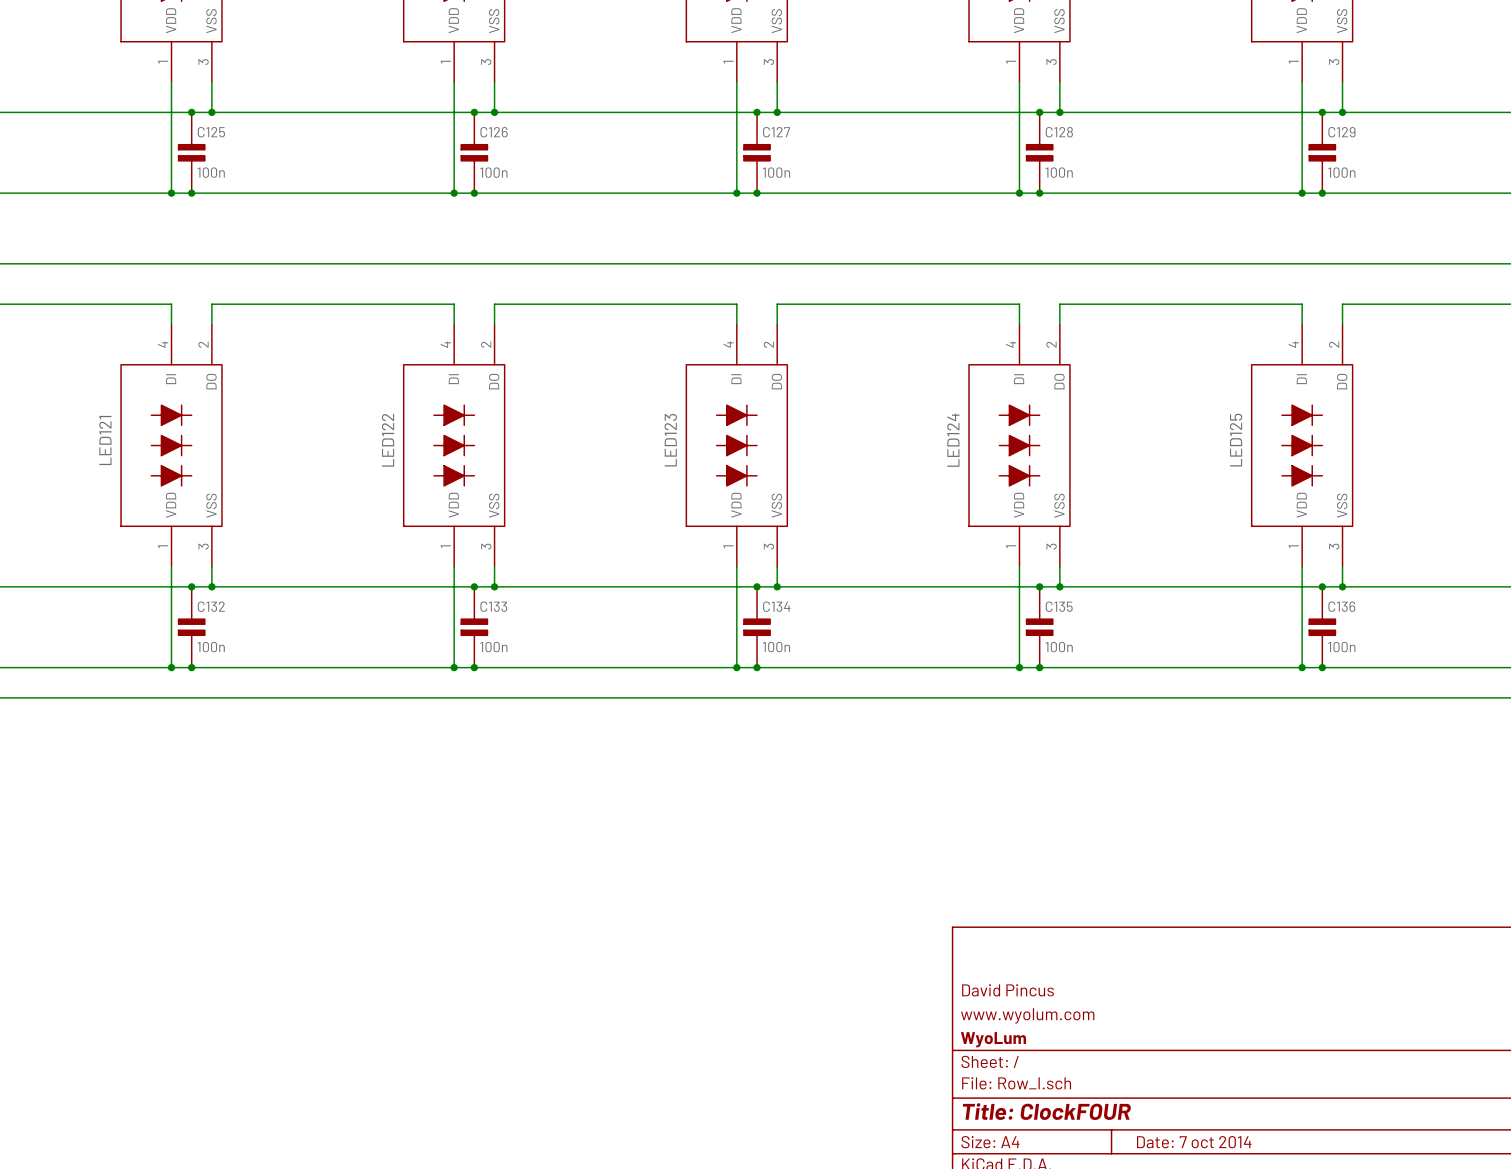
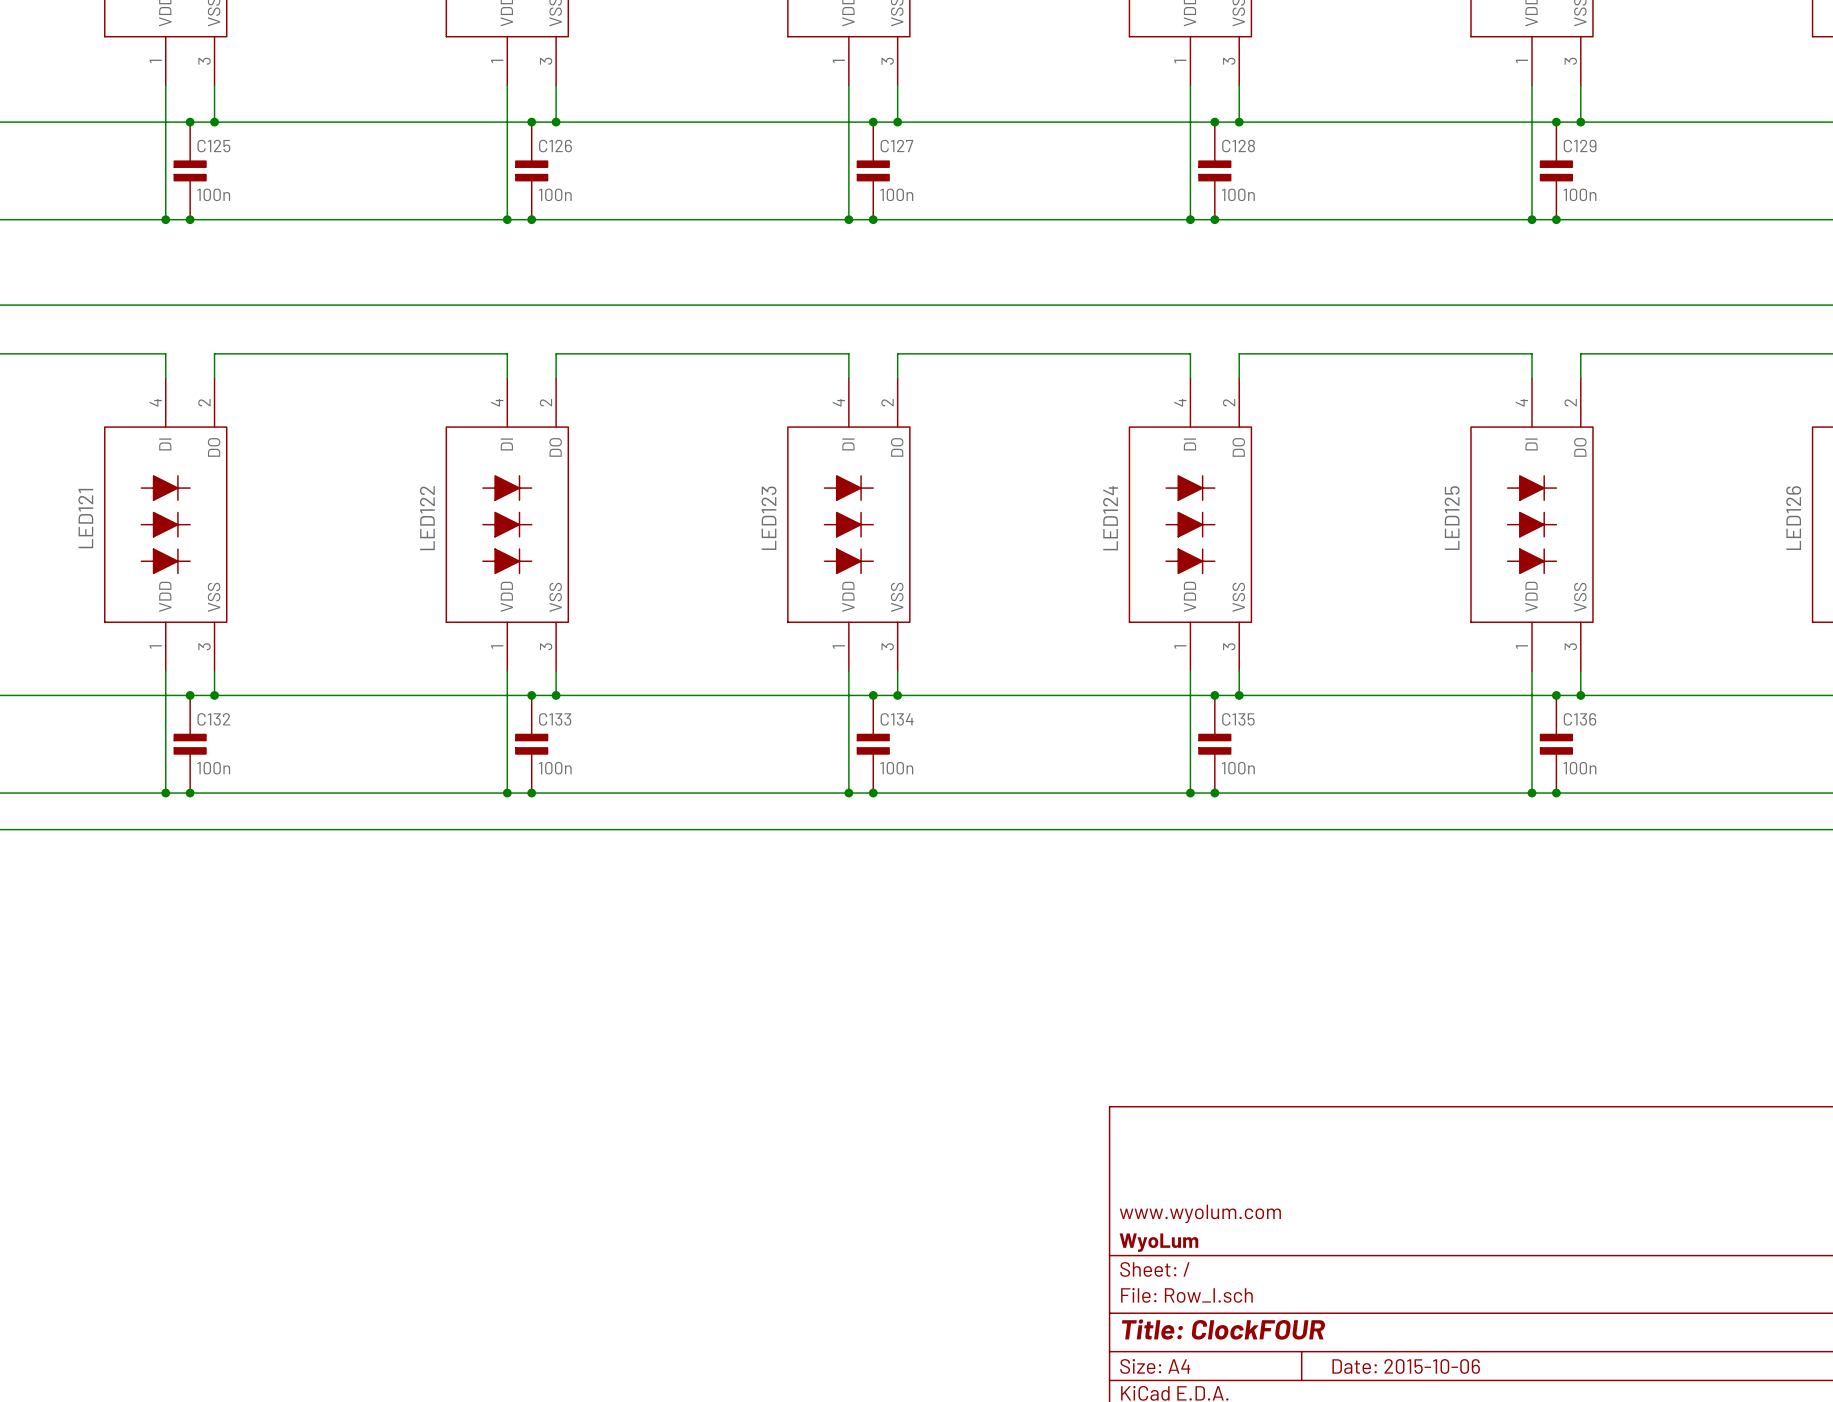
title block: David Pincus (1007, 990) -> none
title block: Date: 7 oct 2014 (1194, 1142) -> Date: 2015-10-06 (1406, 1366)

